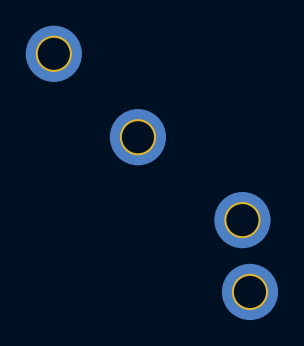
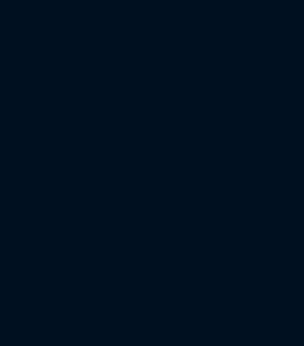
part: (53, 53) -> none
part: (137, 137) -> none
part: (242, 220) -> none
part: (249, 291) -> none

